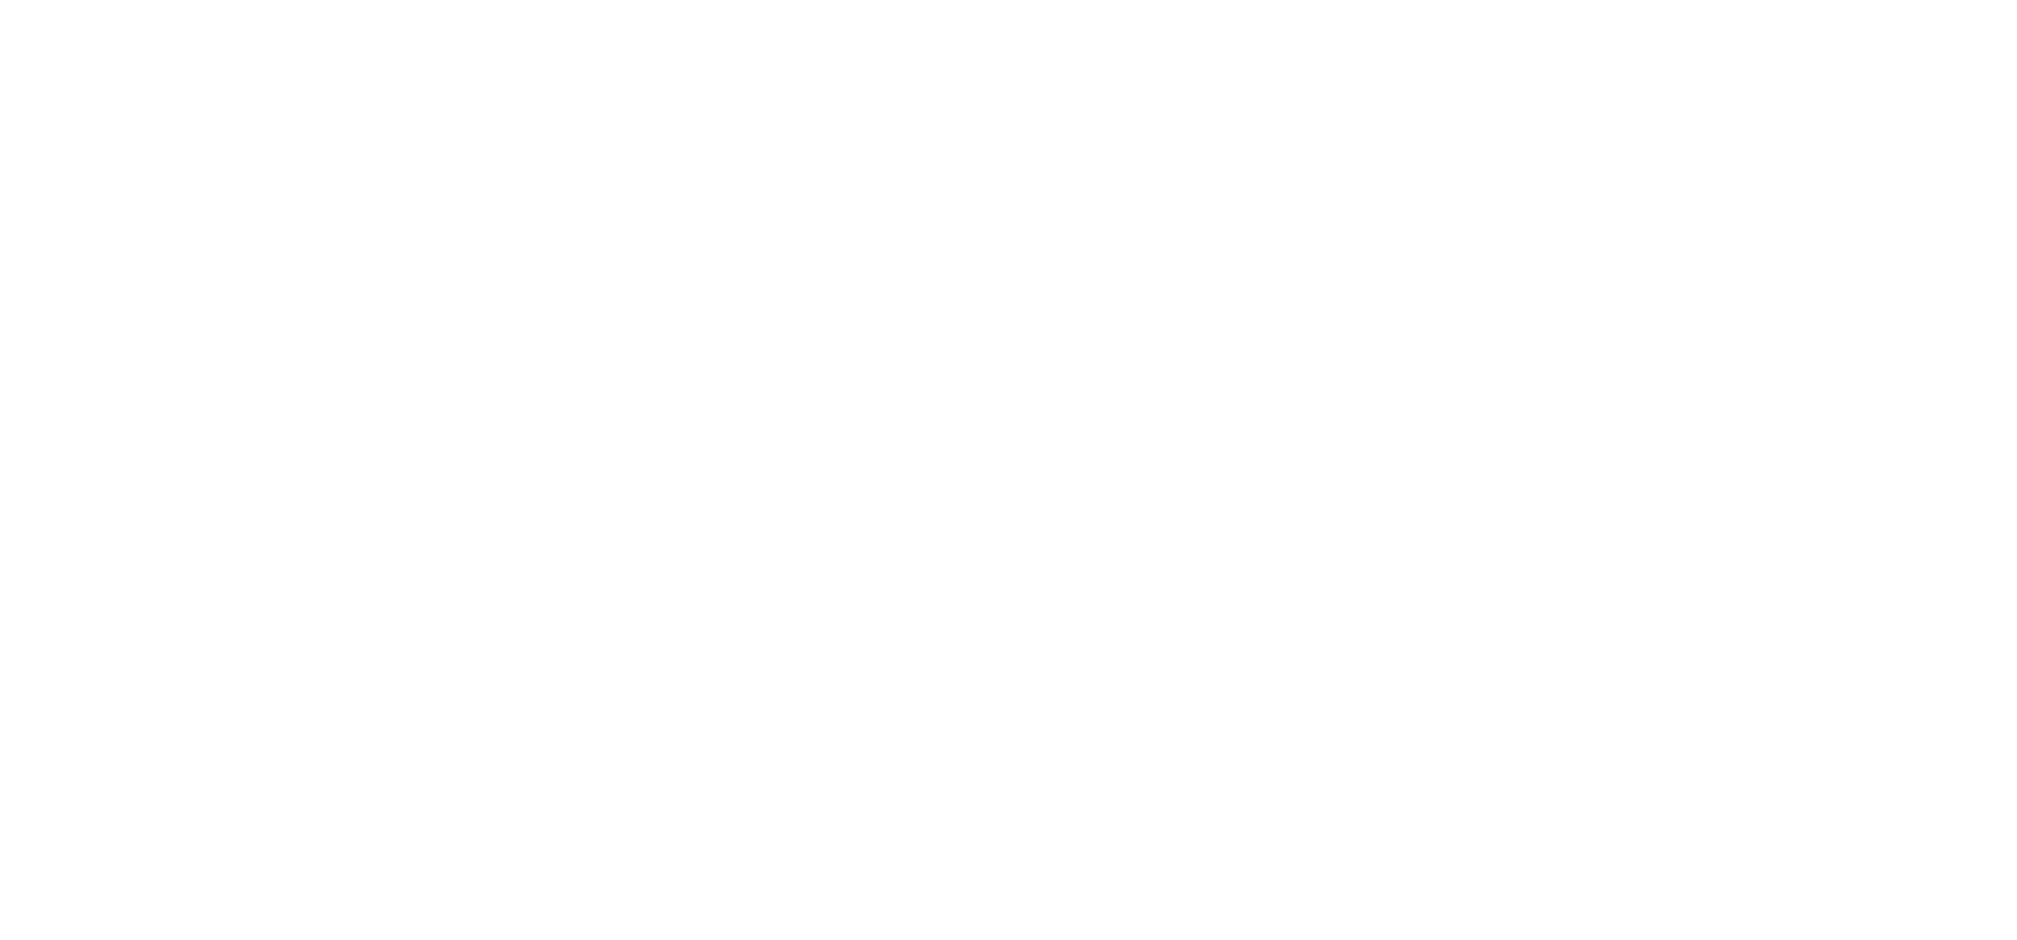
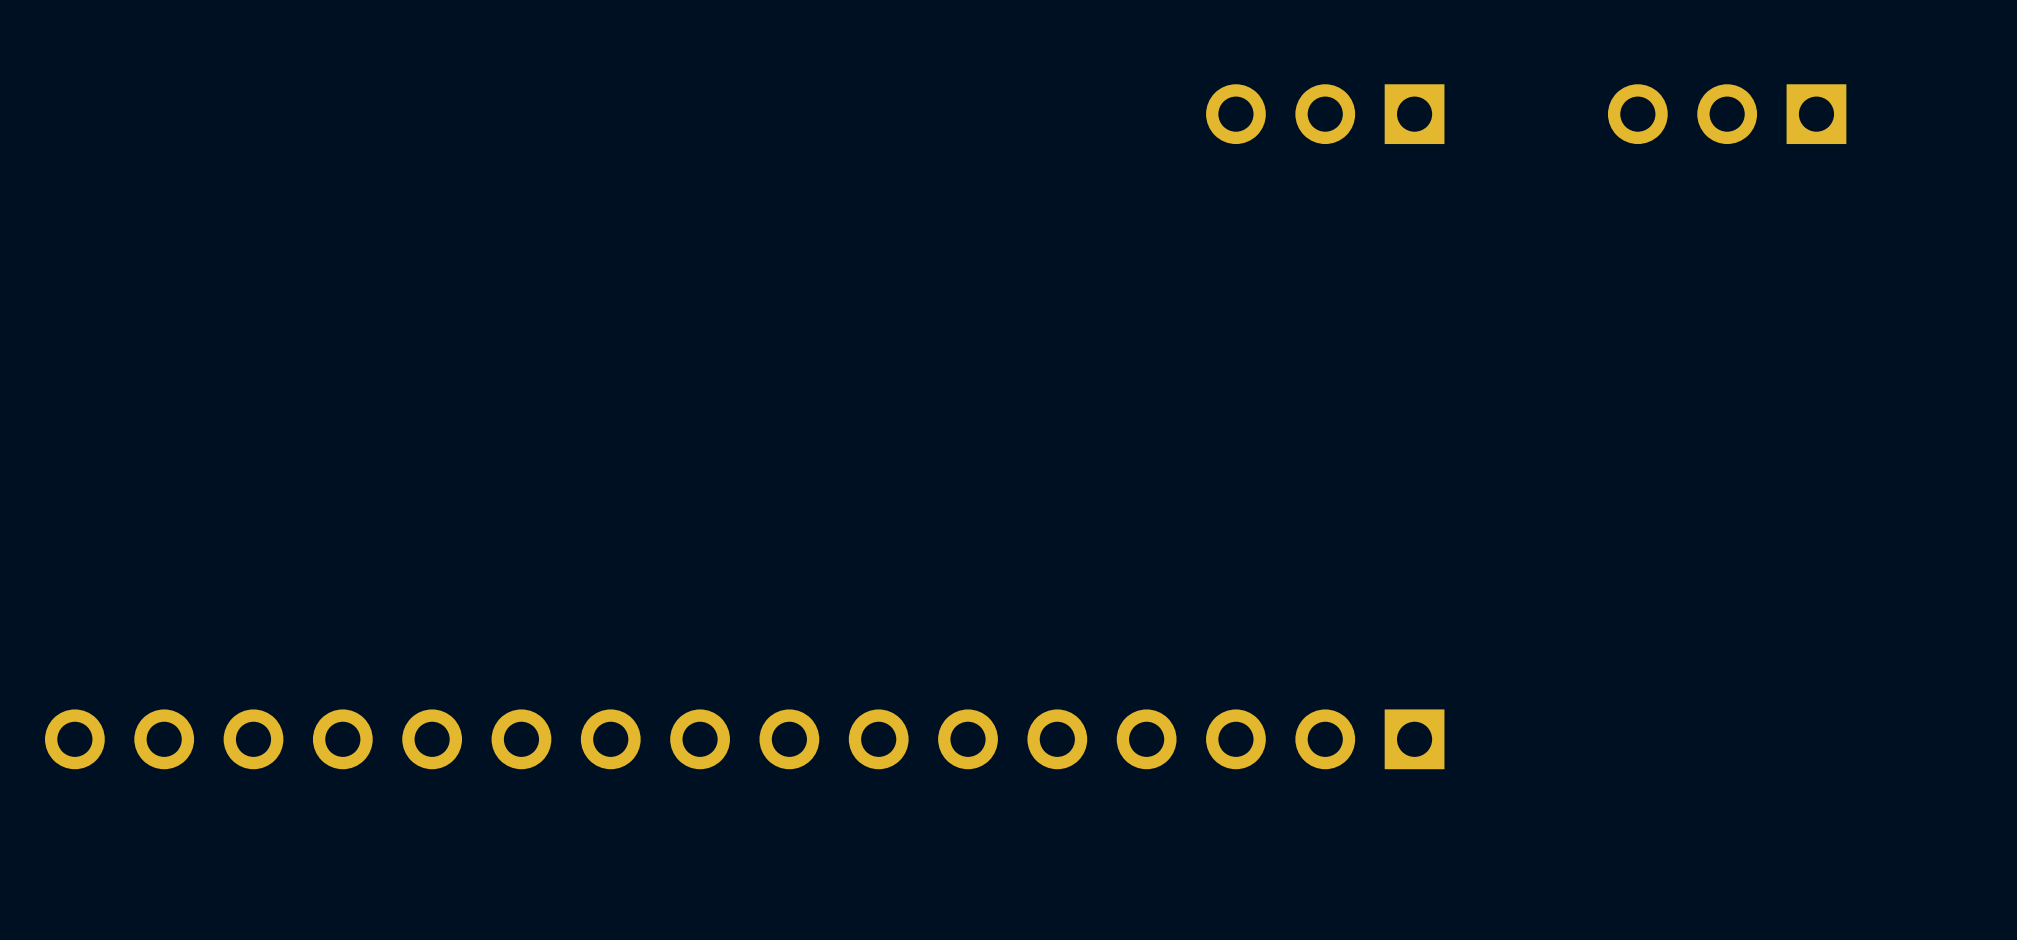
part: none -> (1325, 114)
part: none -> (1727, 114)
part: none -> (744, 739)

